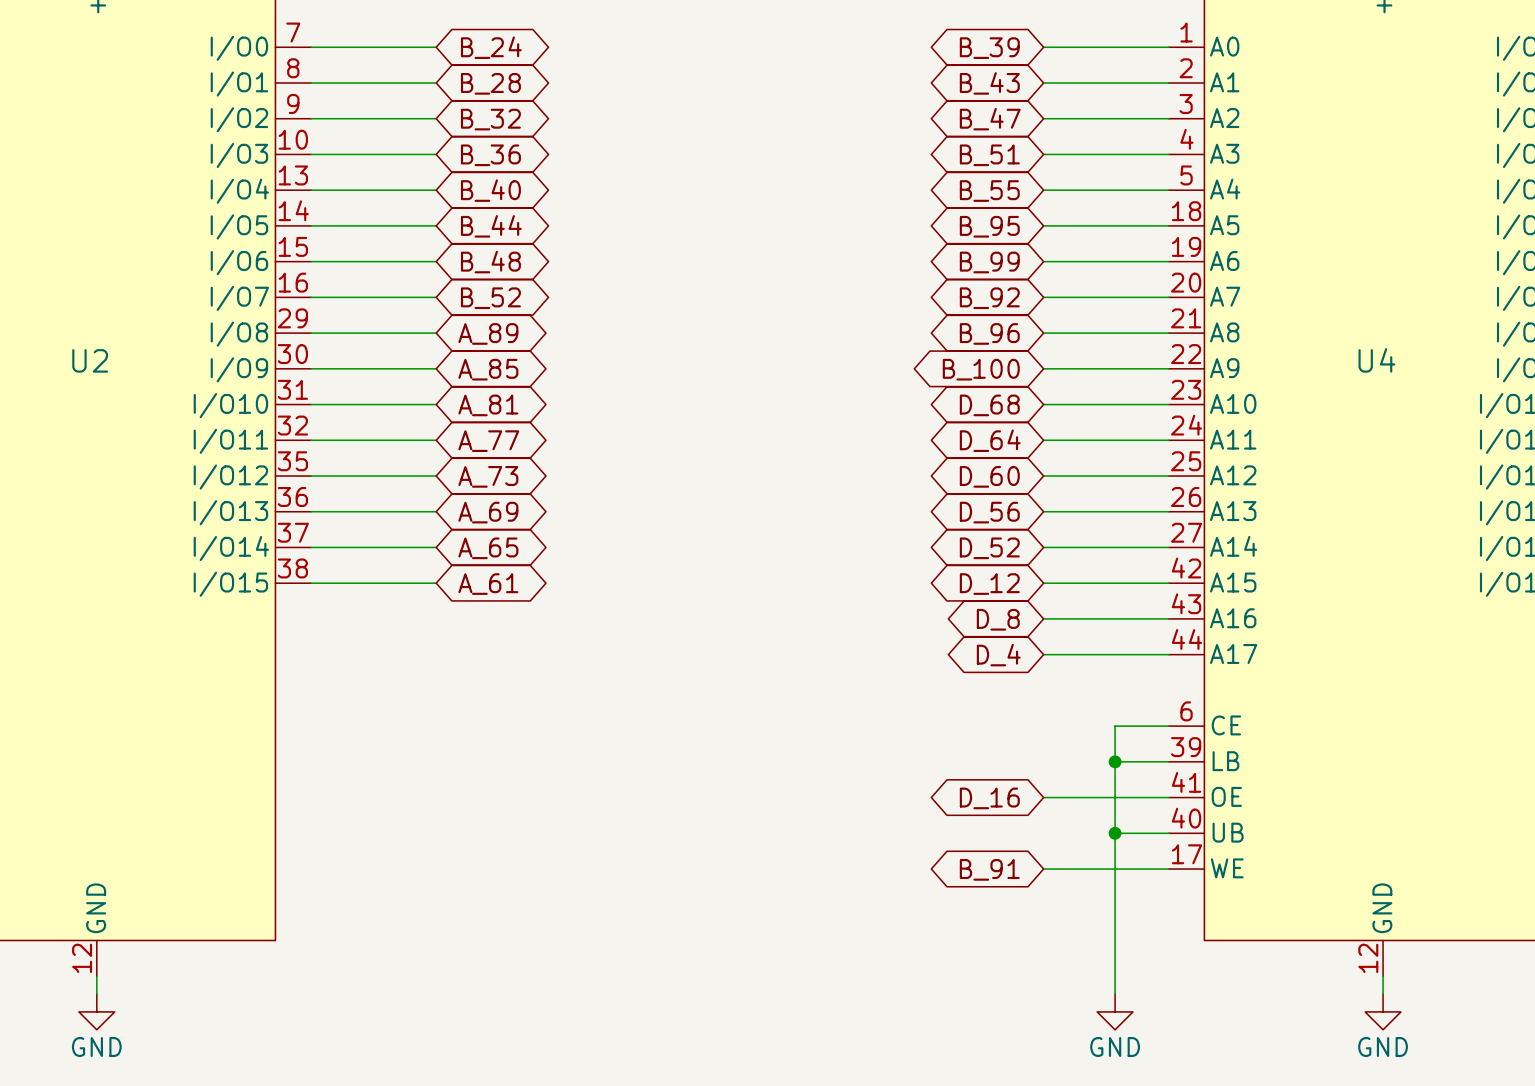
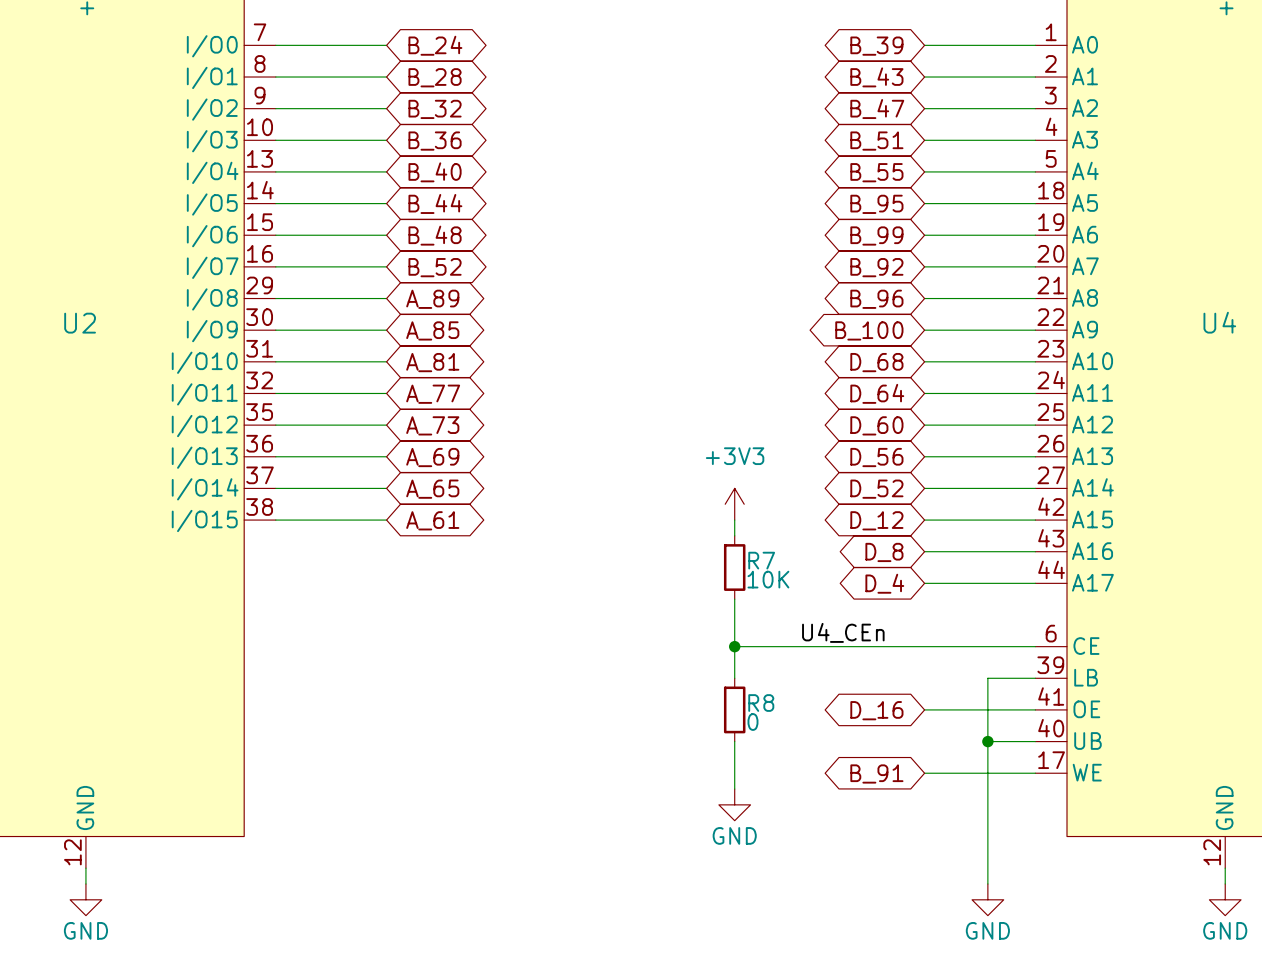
power symbol: none -> +3V3 (734, 504)
wire: none -> (734, 520) (734, 535)
R7: none -> 10K (734, 567)
wire: none -> (734, 599) (734, 678)
label: none -> U4_CEn (843, 632)
junction: none -> (734, 646)
wire: (1115, 726) (1115, 761) -> (987, 646) (734, 646)
junction: (1115, 761) -> none
R8: none -> 0 (734, 709)
wire: none -> (734, 741) (734, 789)
power symbol: none -> GND (734, 804)

